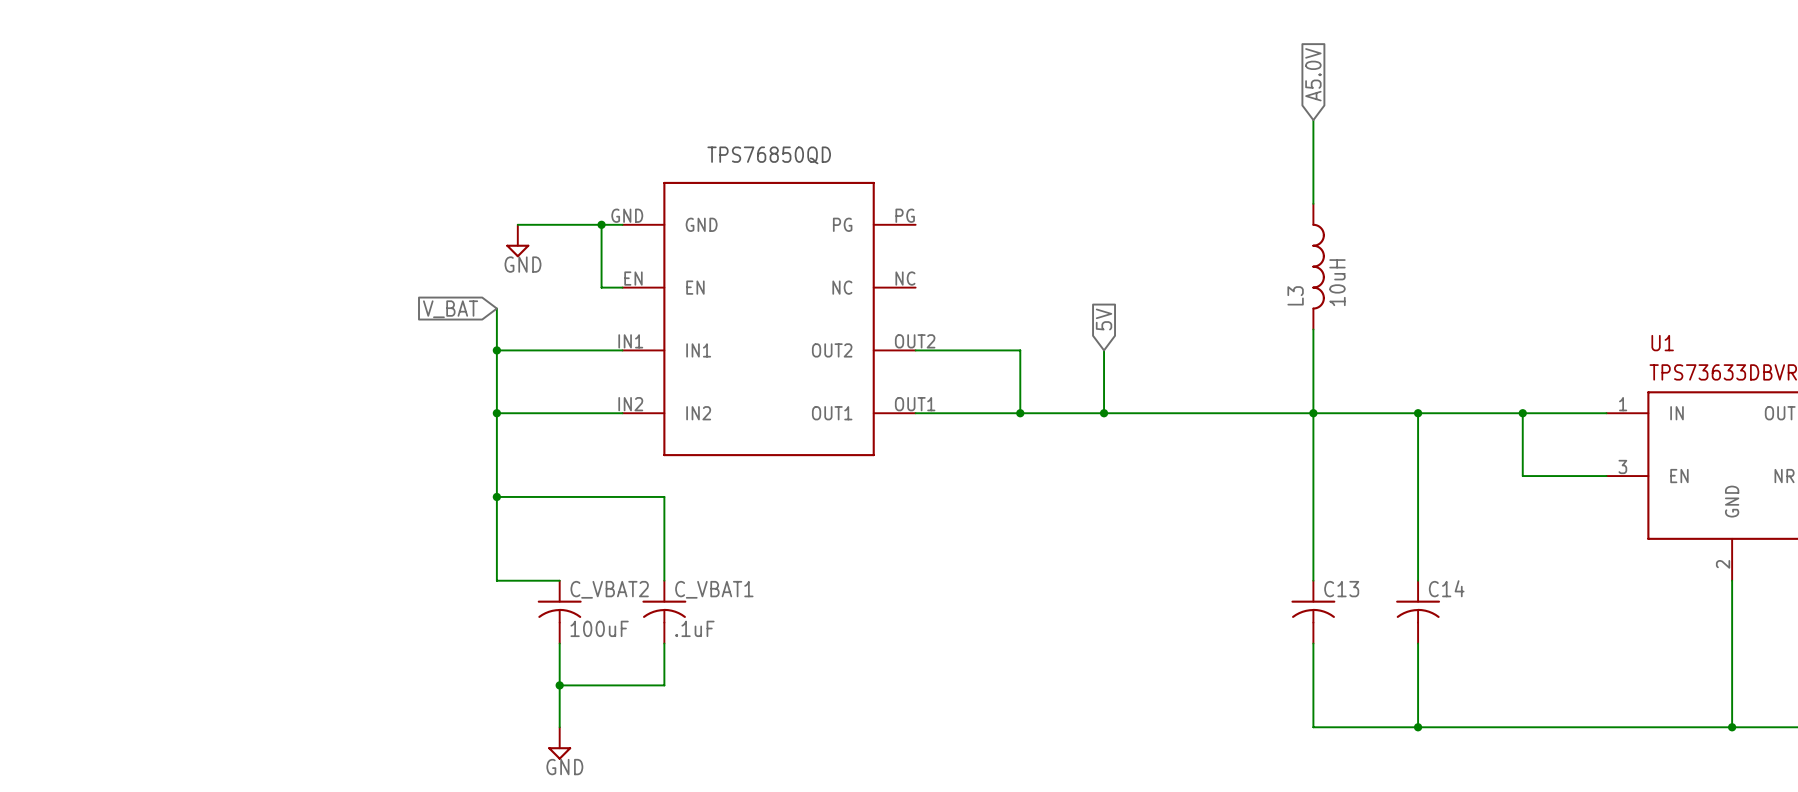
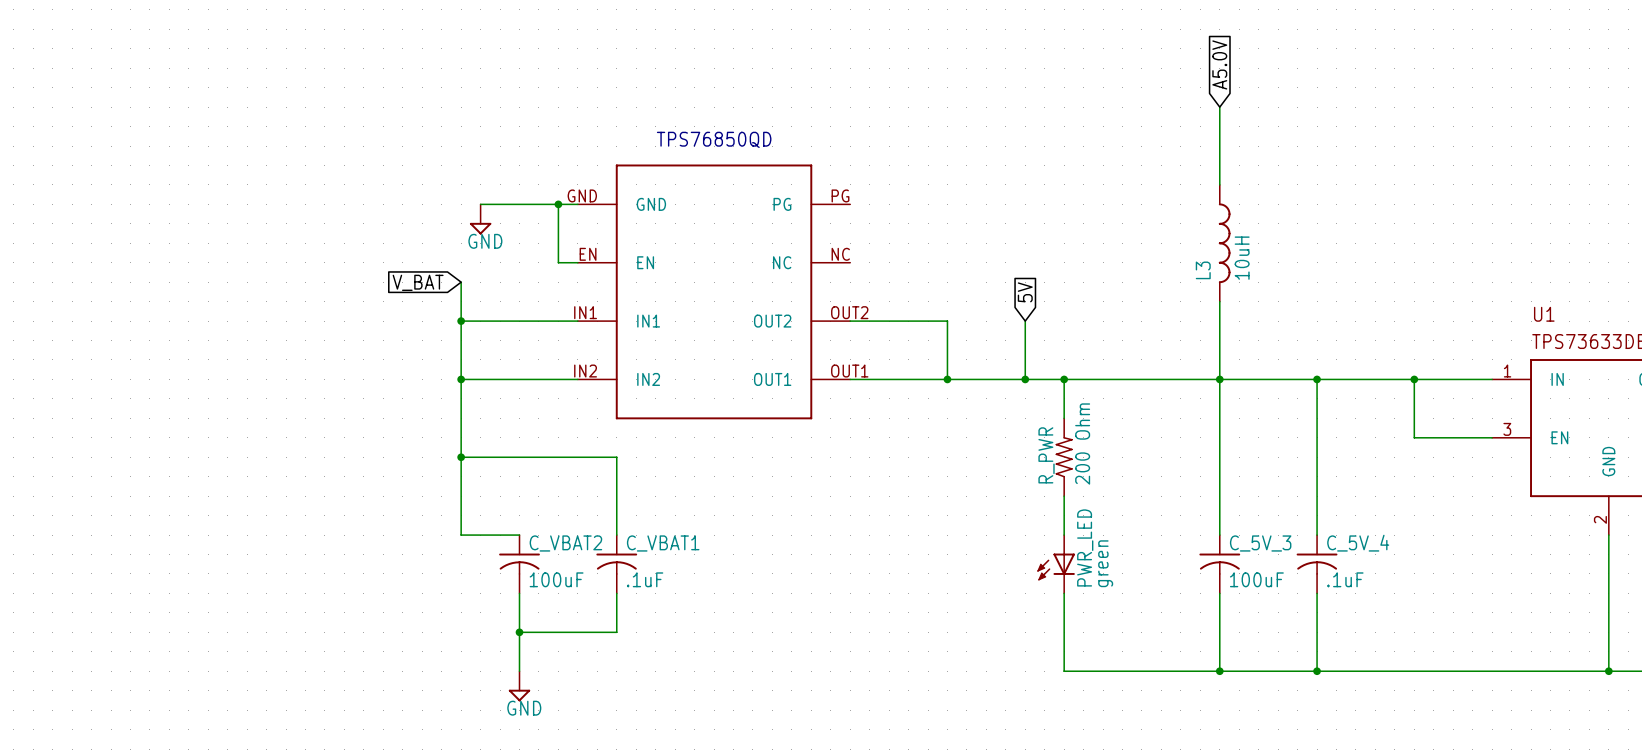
wire: none -> (1064, 379) (1064, 418)
junction: none -> (1064, 379)
R_PWR: none -> 200 Ohm (1064, 457)
wire: none -> (1064, 496) (1064, 535)
C14 name: C14 (1446, 588) -> C_5V_4 (1358, 543)
C13 name: C13 (1341, 589) -> C_5V_3 (1260, 543)
PWR_LED: none -> green (1056, 564)
C13 value: none -> 100uF (1256, 579)
C14 value: none -> .1uF (1345, 579)
wire: none -> (1064, 593) (1064, 671) (1219, 671)
junction: none -> (1219, 671)

